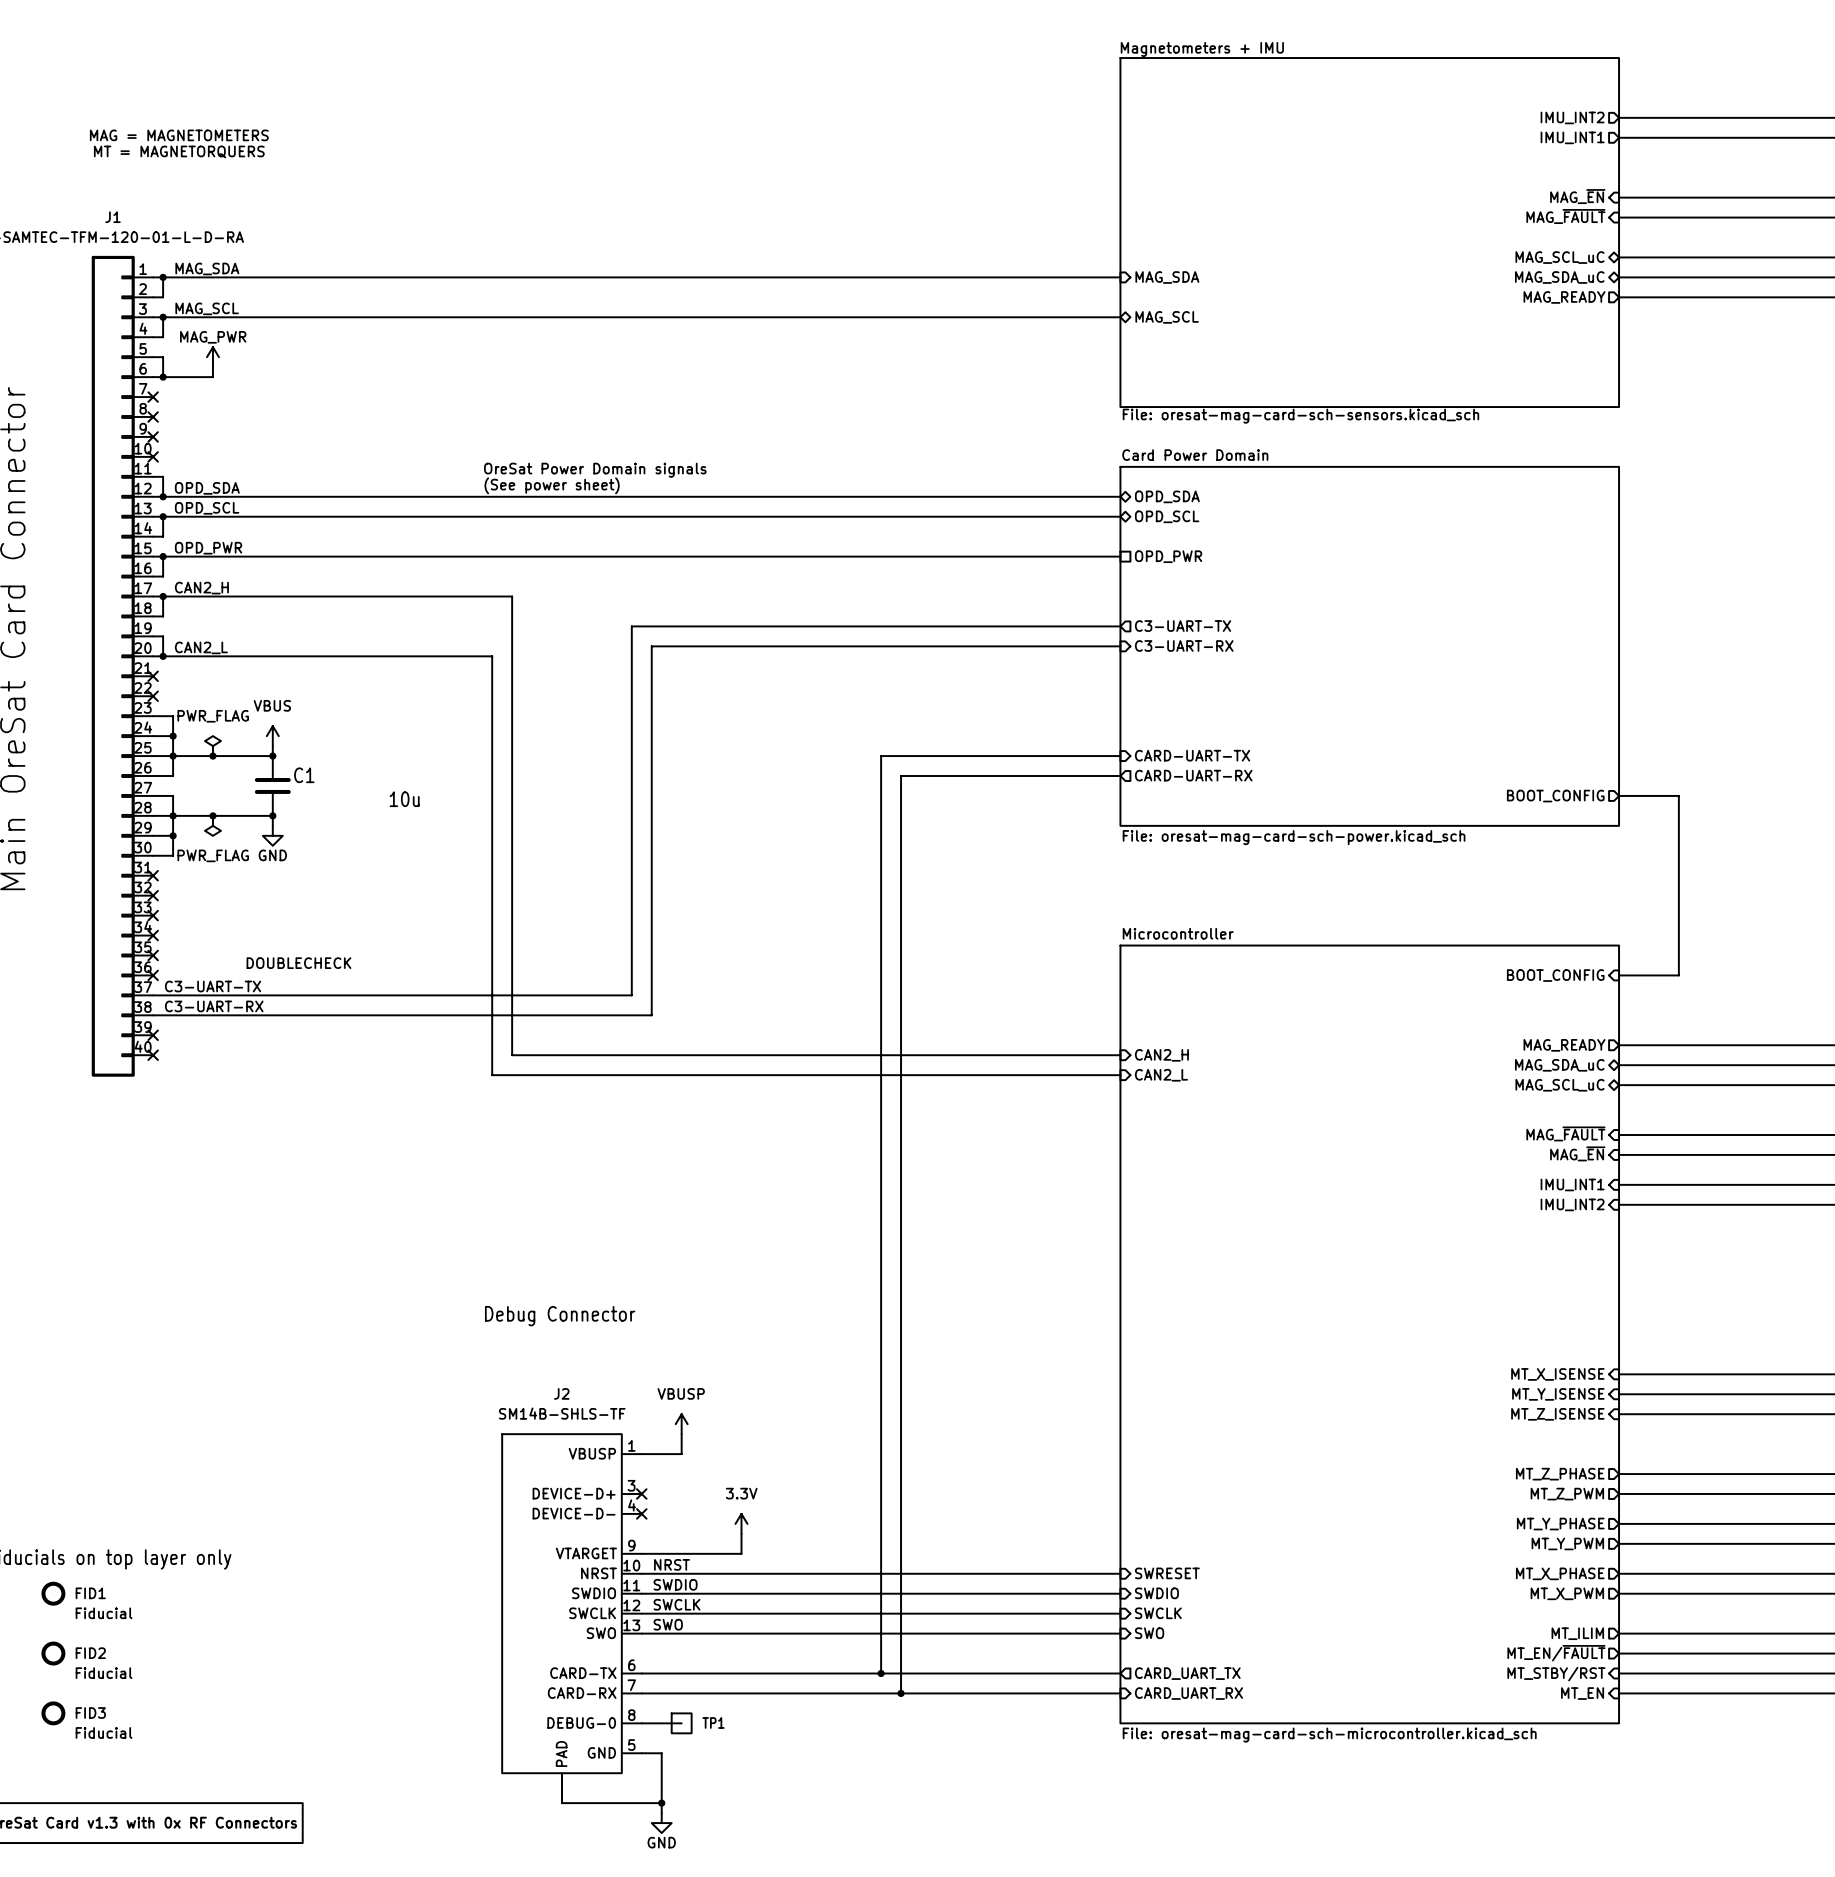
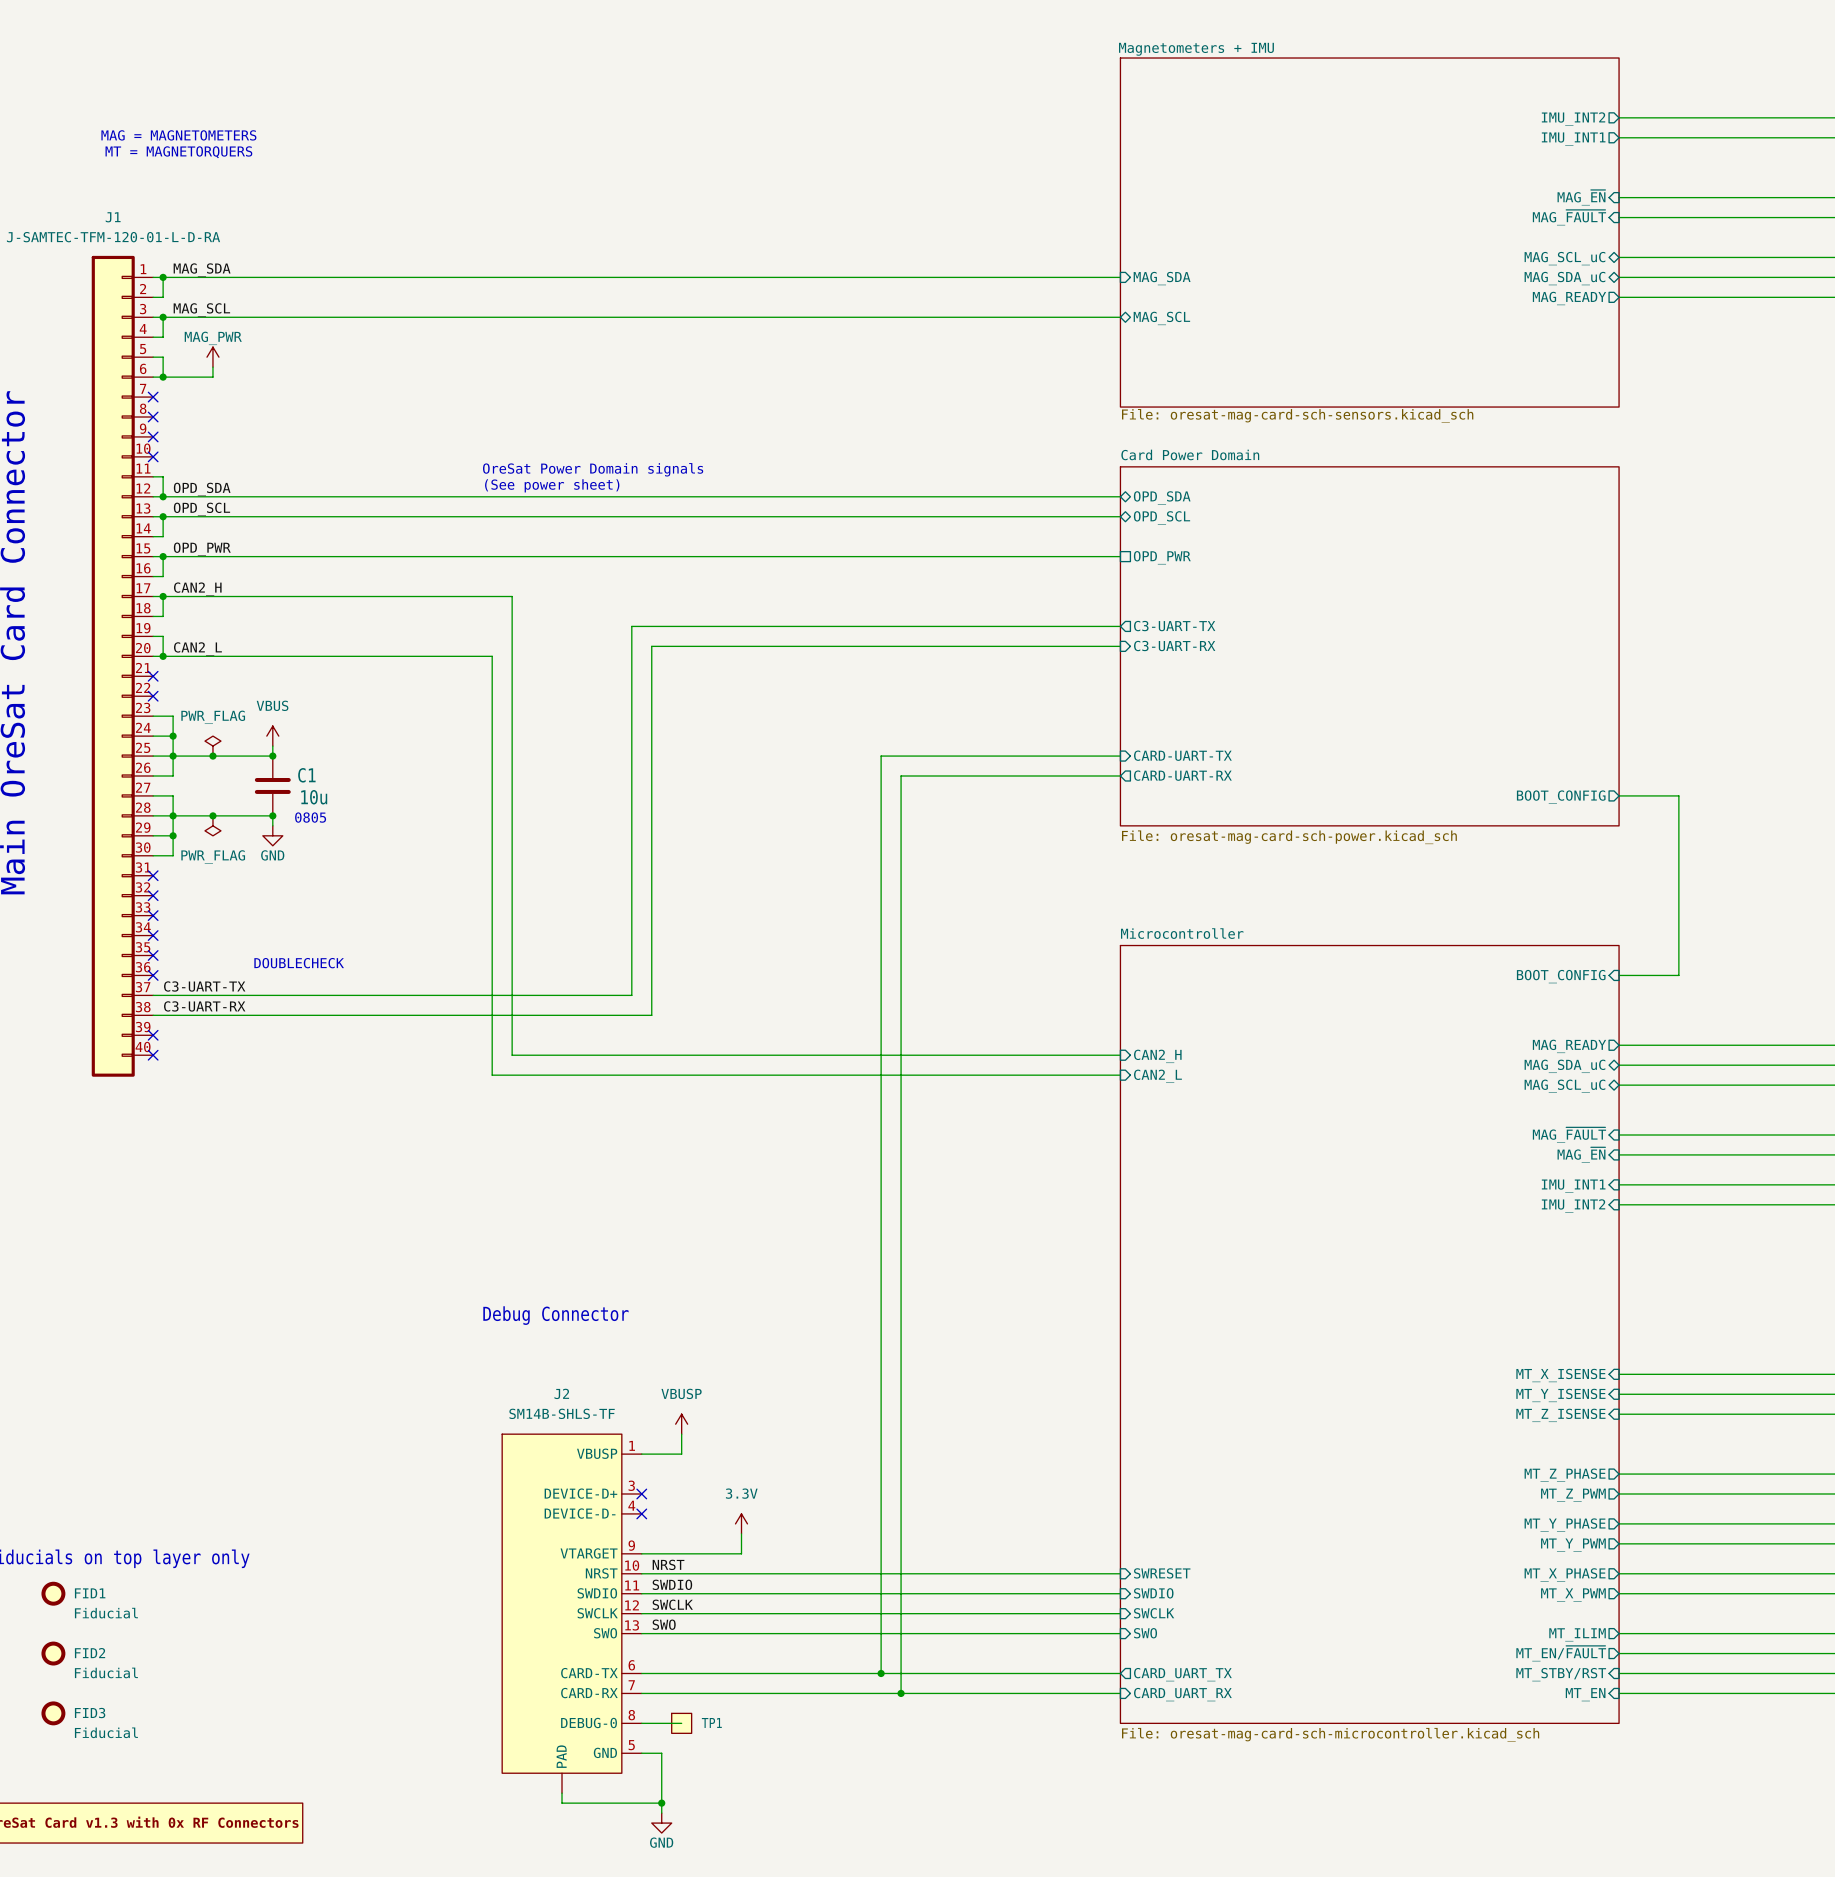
C1 value position: 10u (404, 799) -> 10u (314, 797)
text: none -> 0805 (310, 817)

